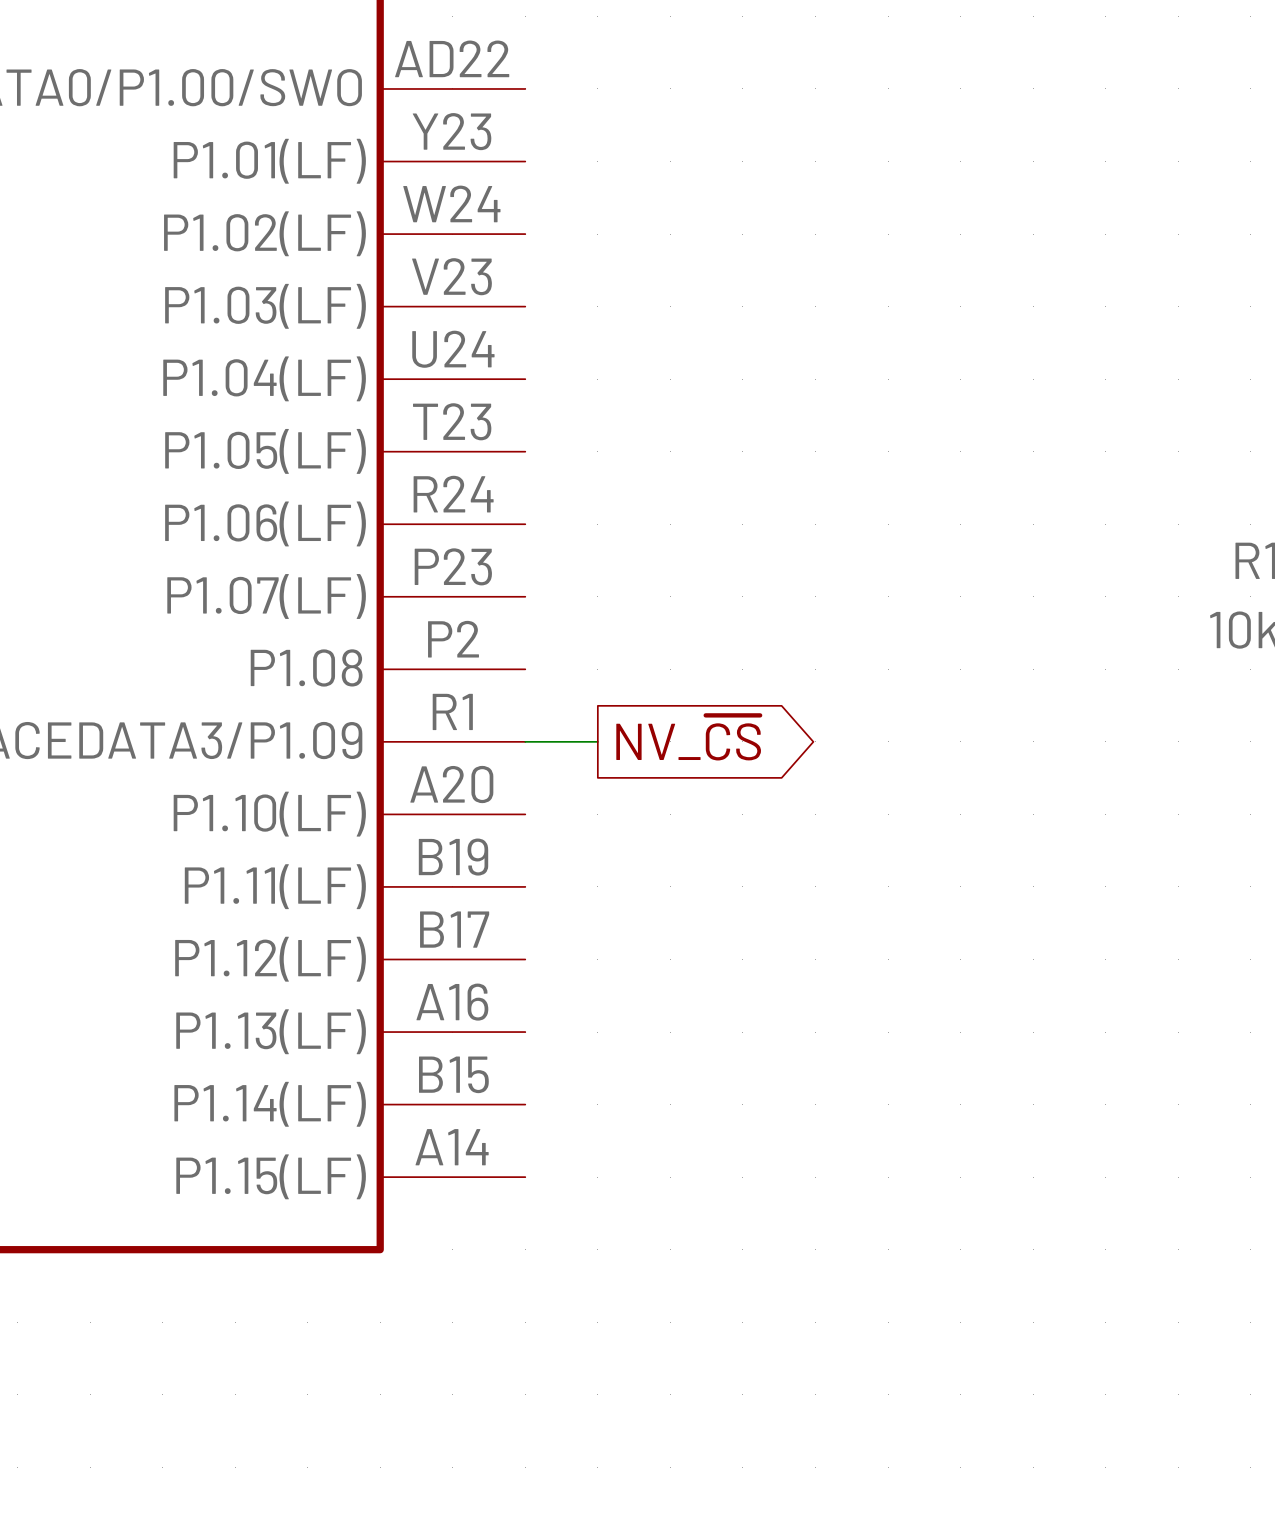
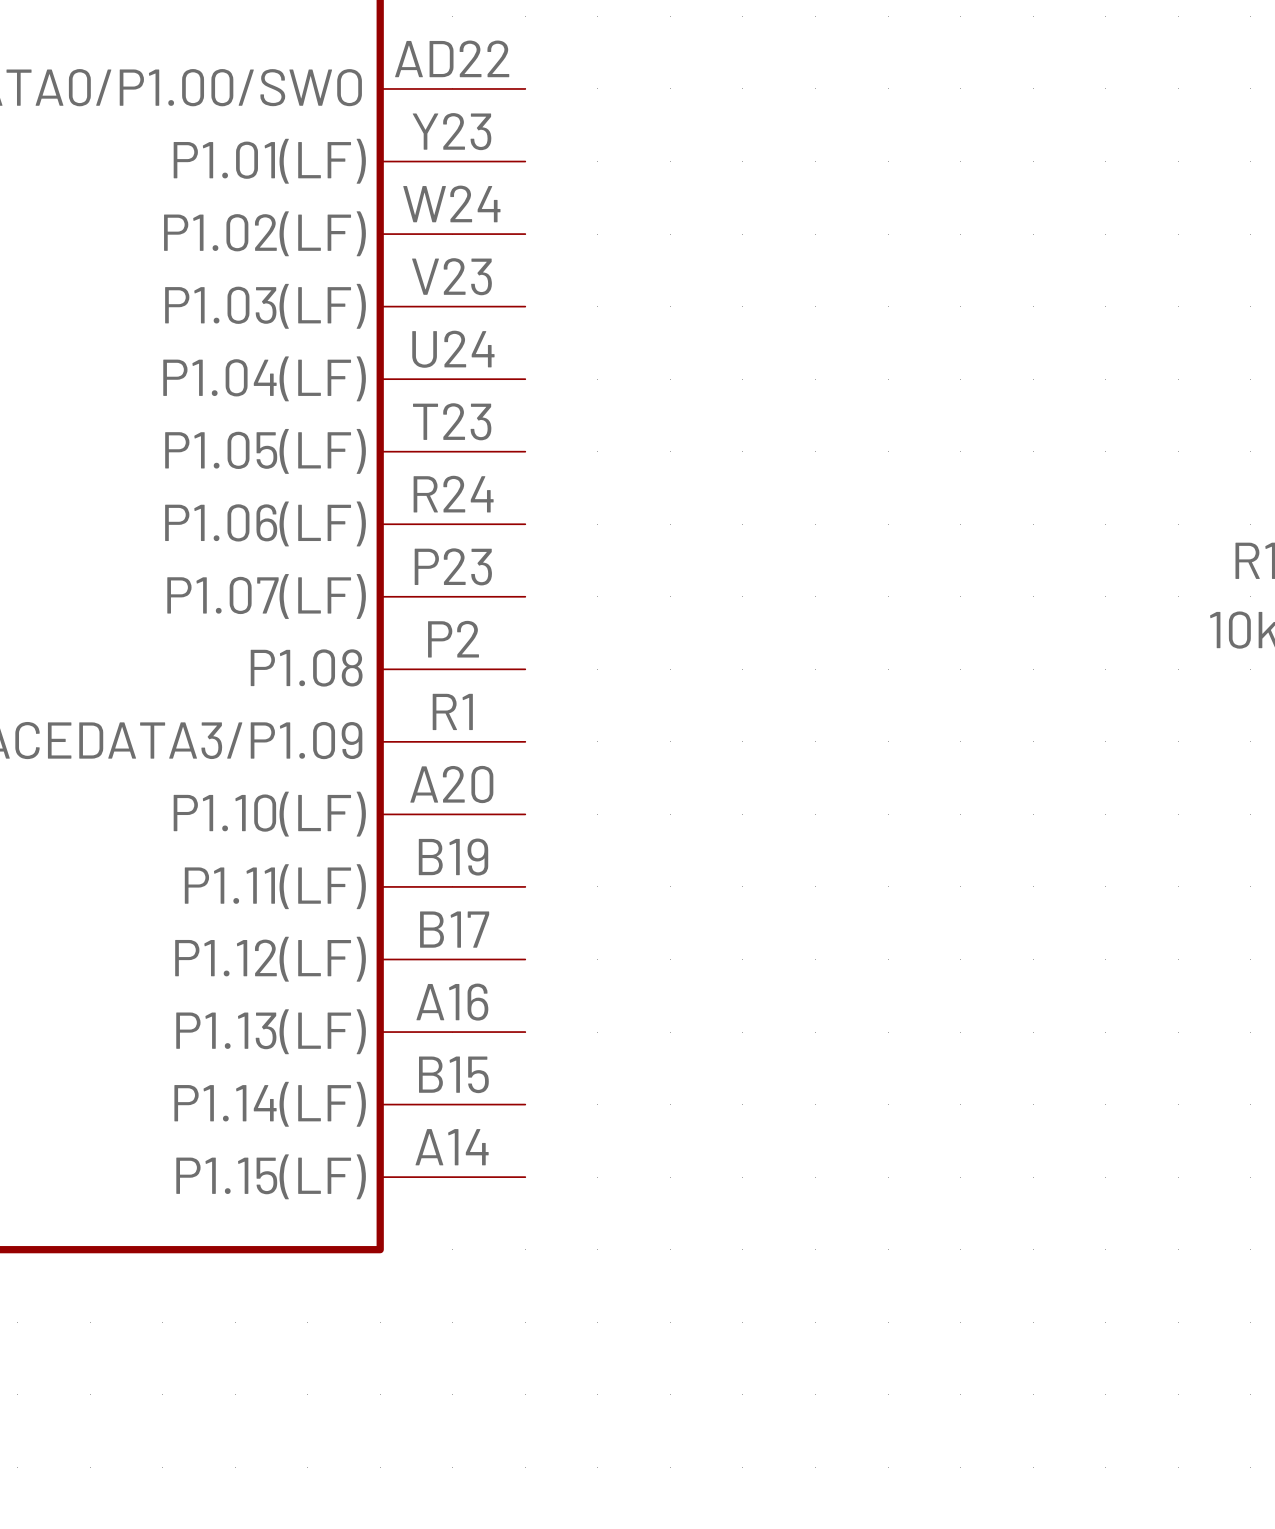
global label: NV_~{CS} (688, 737) -> none
wire: (525, 741) (597, 741) -> none

